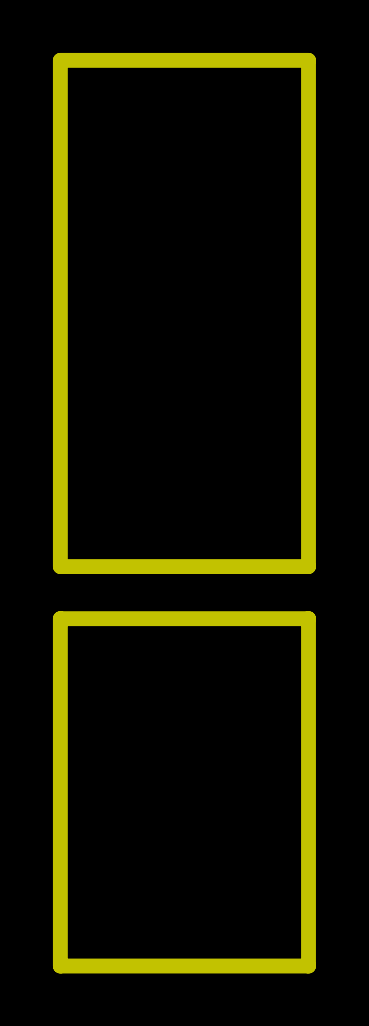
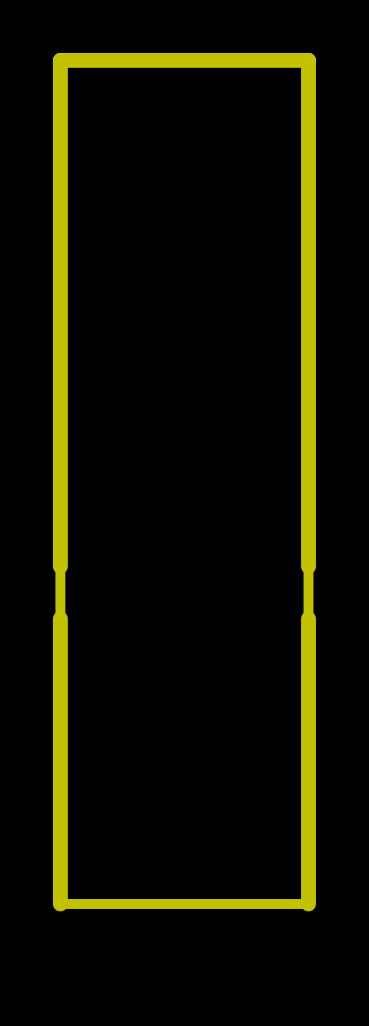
board edge: (308, 566) (60, 566) -> (308, 566) (308, 618)
board edge: (308, 618) (60, 618) -> (60, 566) (60, 618)
board edge: (308, 903) (308, 966) (60, 966) (60, 903) -> (308, 903) (60, 903)

